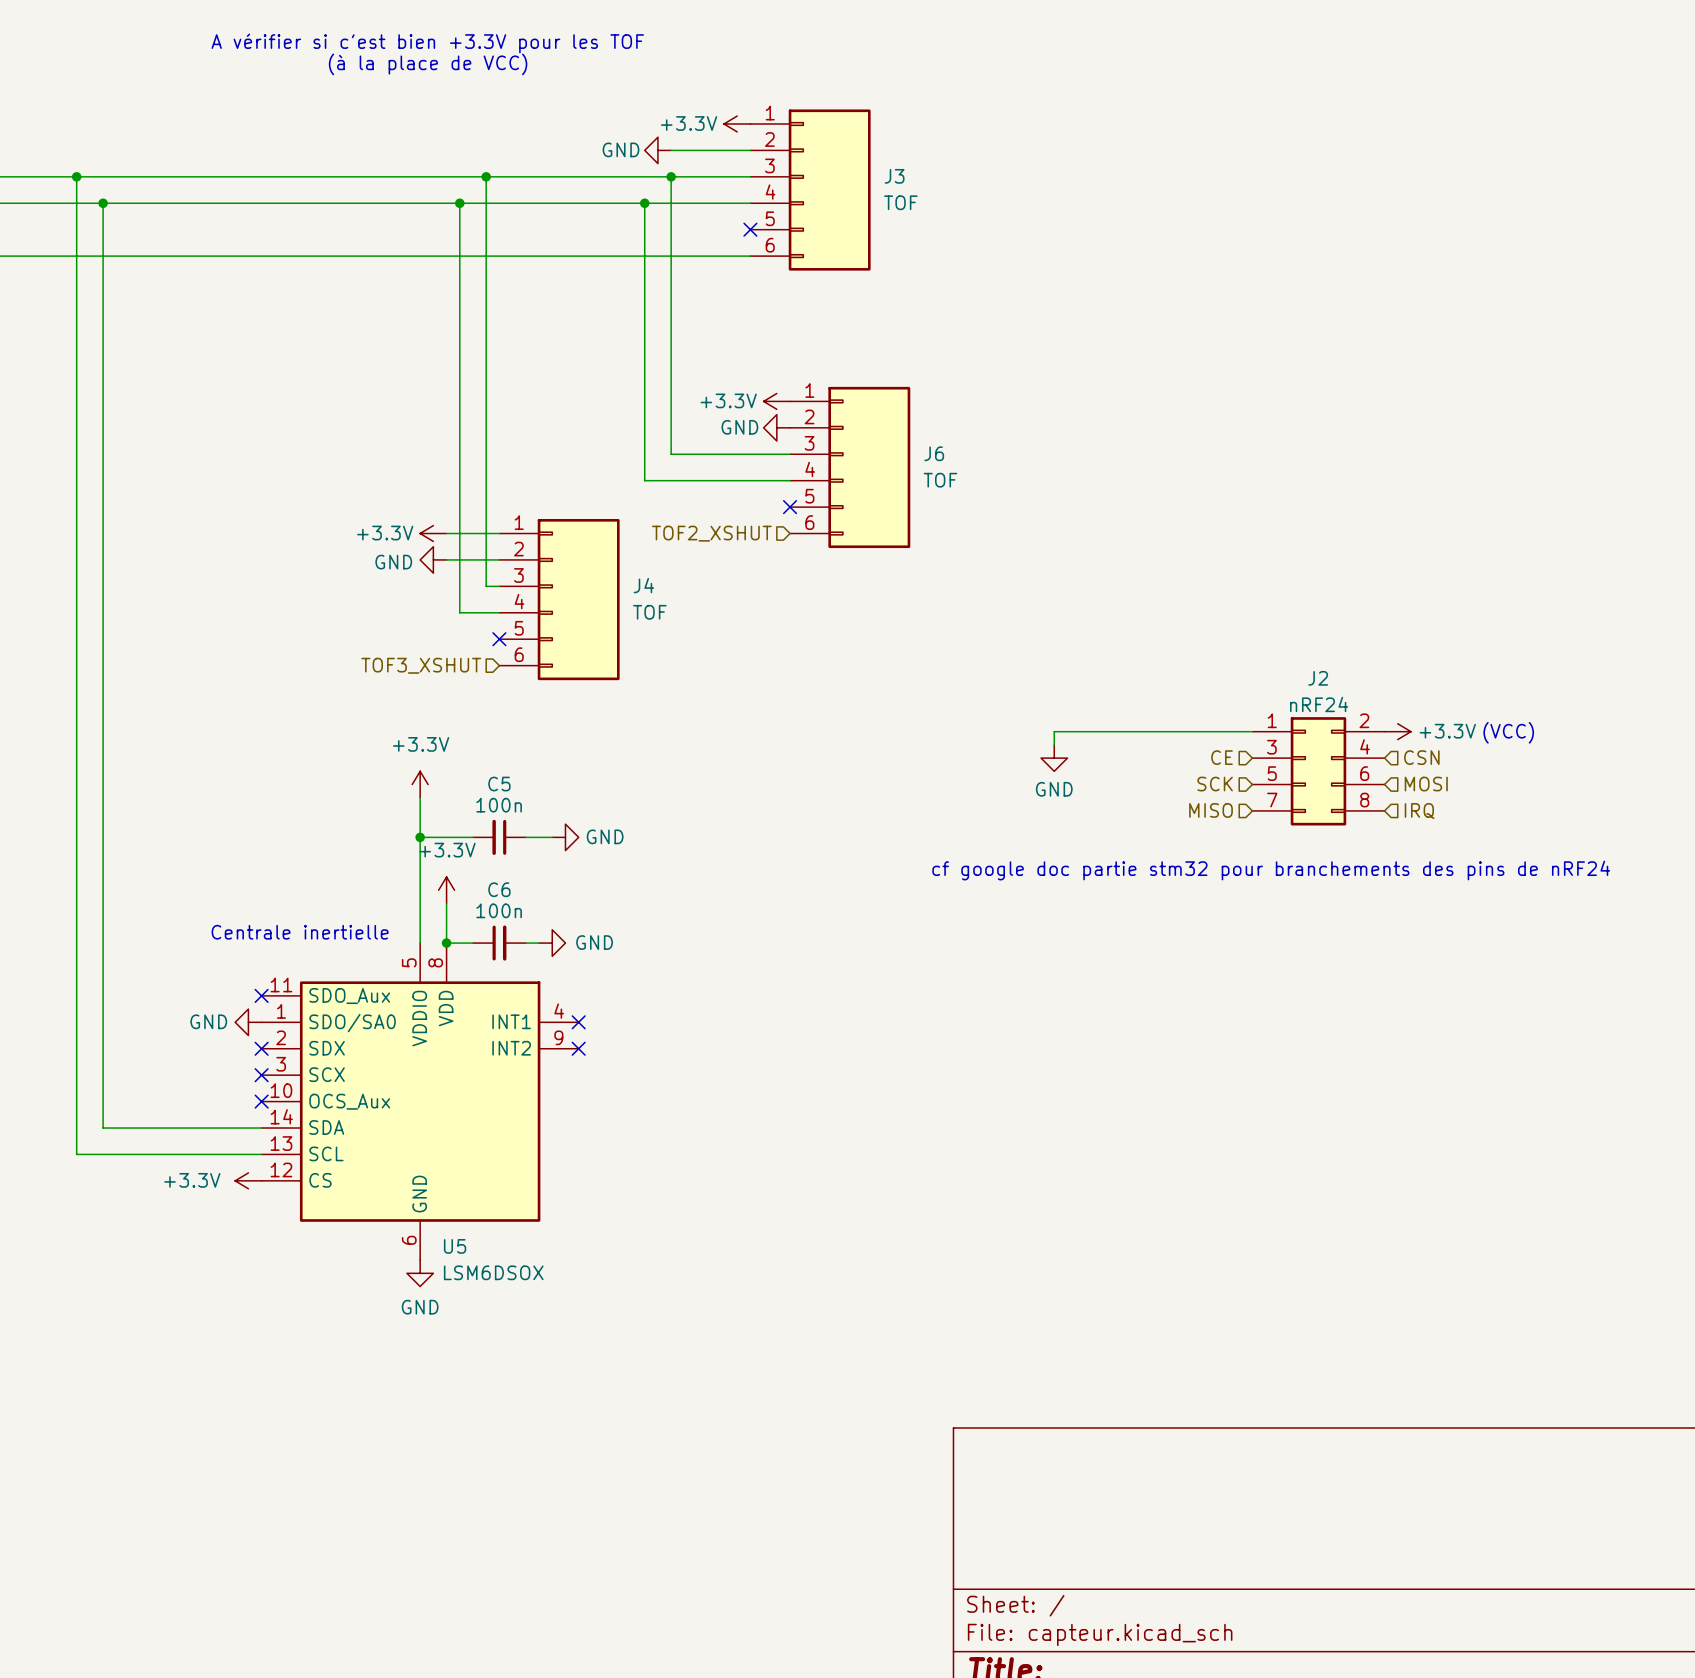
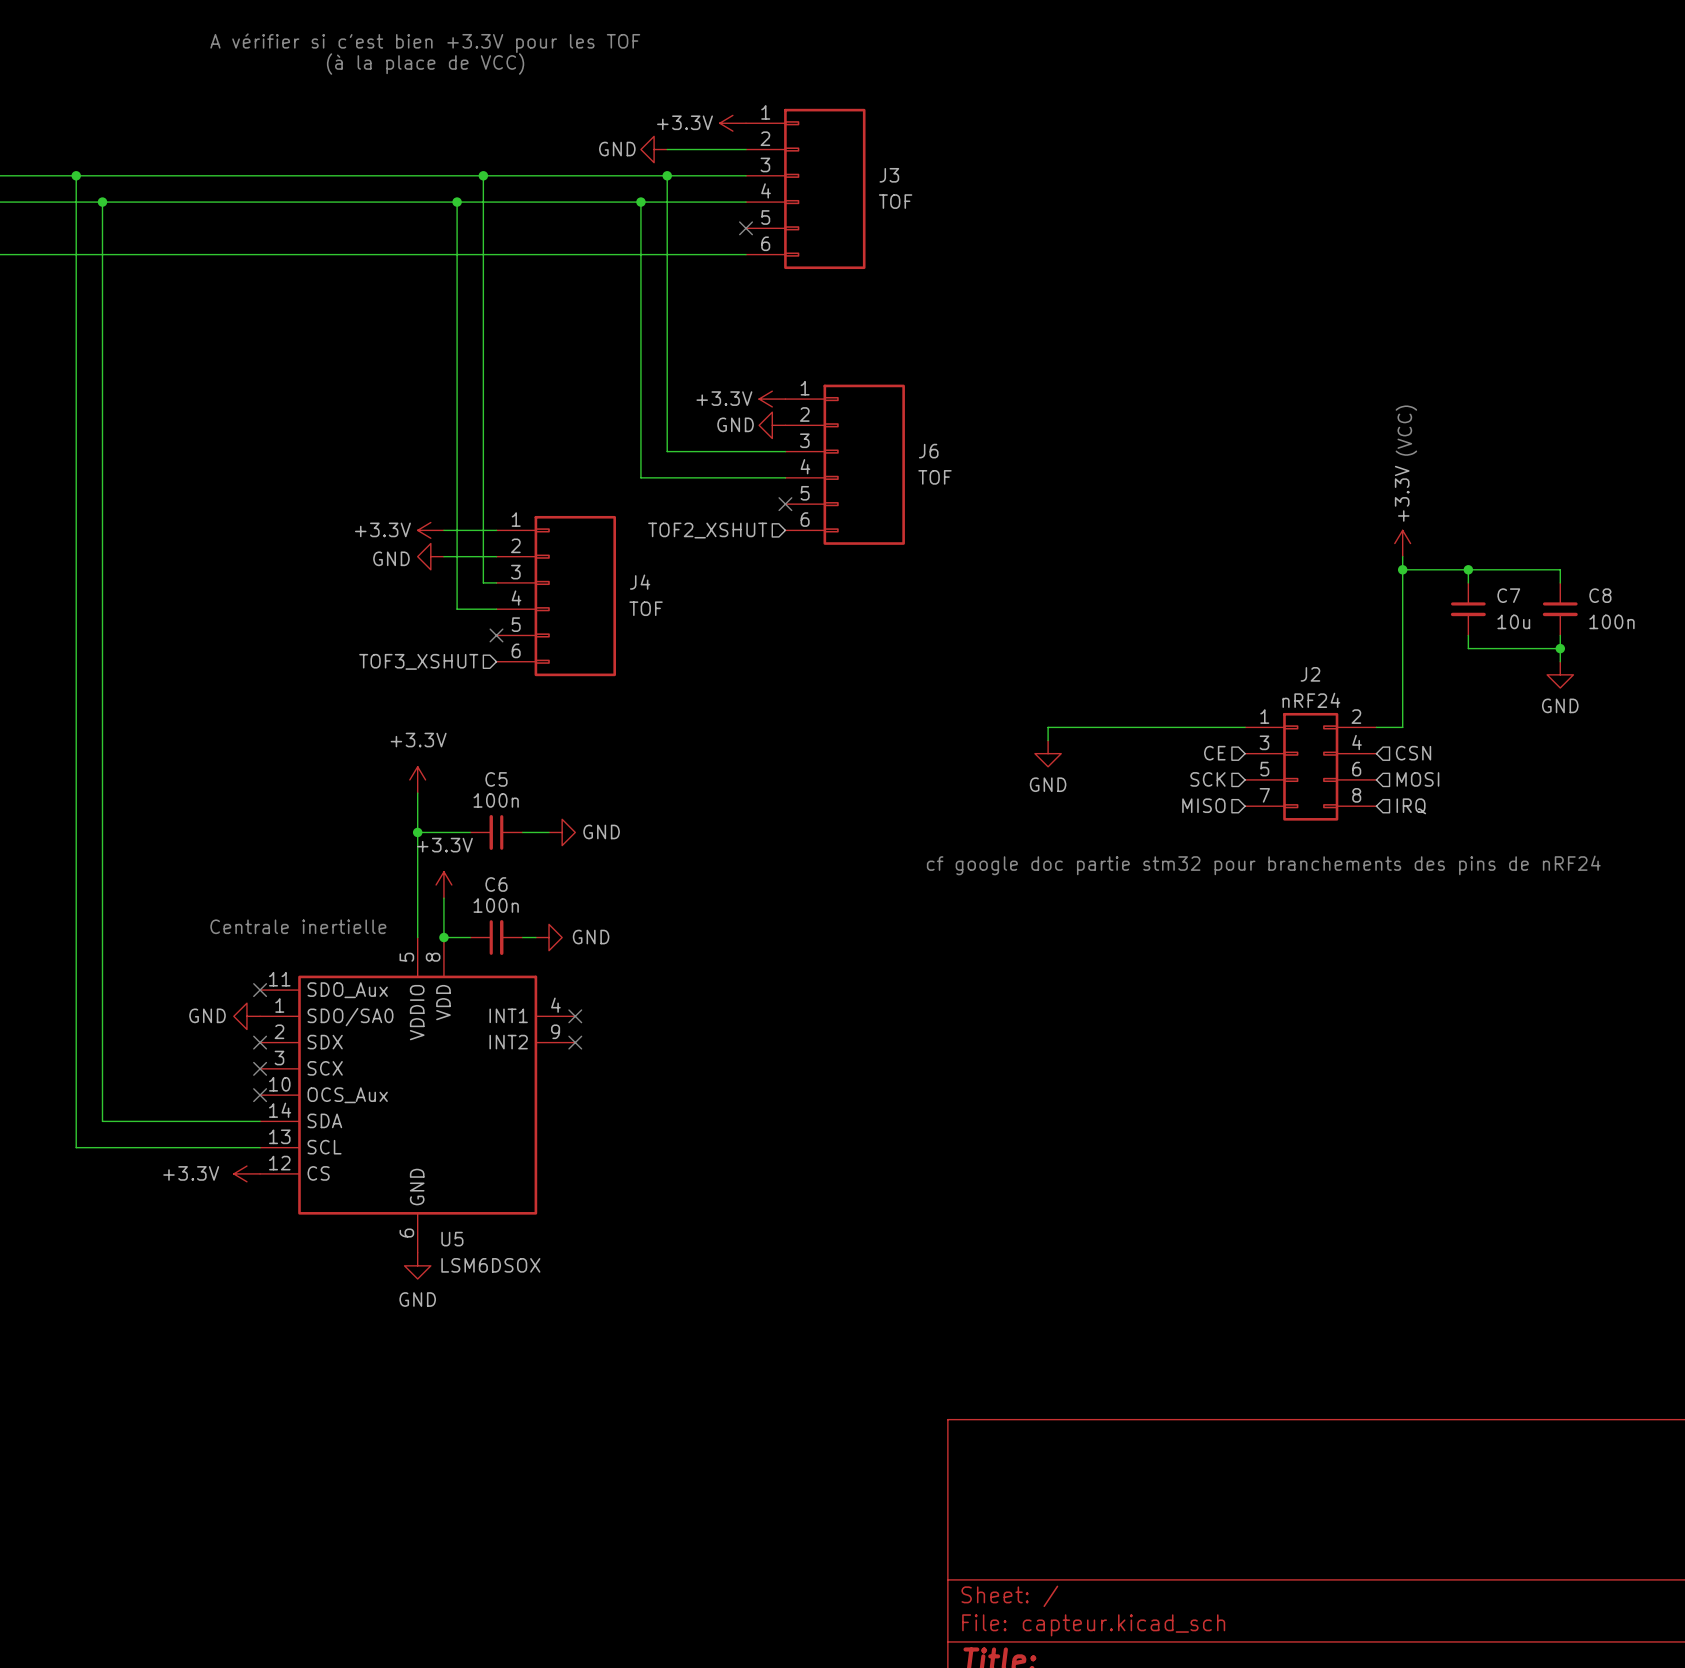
text: none -> (VCC) (1406, 430)
wire: none -> (1402, 556) (1402, 727) (1376, 727)
wire: none -> (1402, 569) (1560, 569) (1560, 582)
junction: none -> (1402, 569)
wire: none -> (1468, 569) (1468, 582)
junction: none -> (1468, 569)
C7: none -> 10u (1468, 609)
C8: none -> 100n (1560, 609)
wire: none -> (1468, 635) (1468, 648) (1560, 648)
wire: none -> (1560, 635) (1560, 661)
junction: none -> (1560, 648)
power symbol: none -> GND (1560, 674)
power symbol rotation: 0° (1397, 731) -> 90° counterclockwise (1402, 543)
power symbol position: +3.3V (1397, 731) -> +3.3V (1402, 543)
text: (VCC) (1508, 732) -> none

